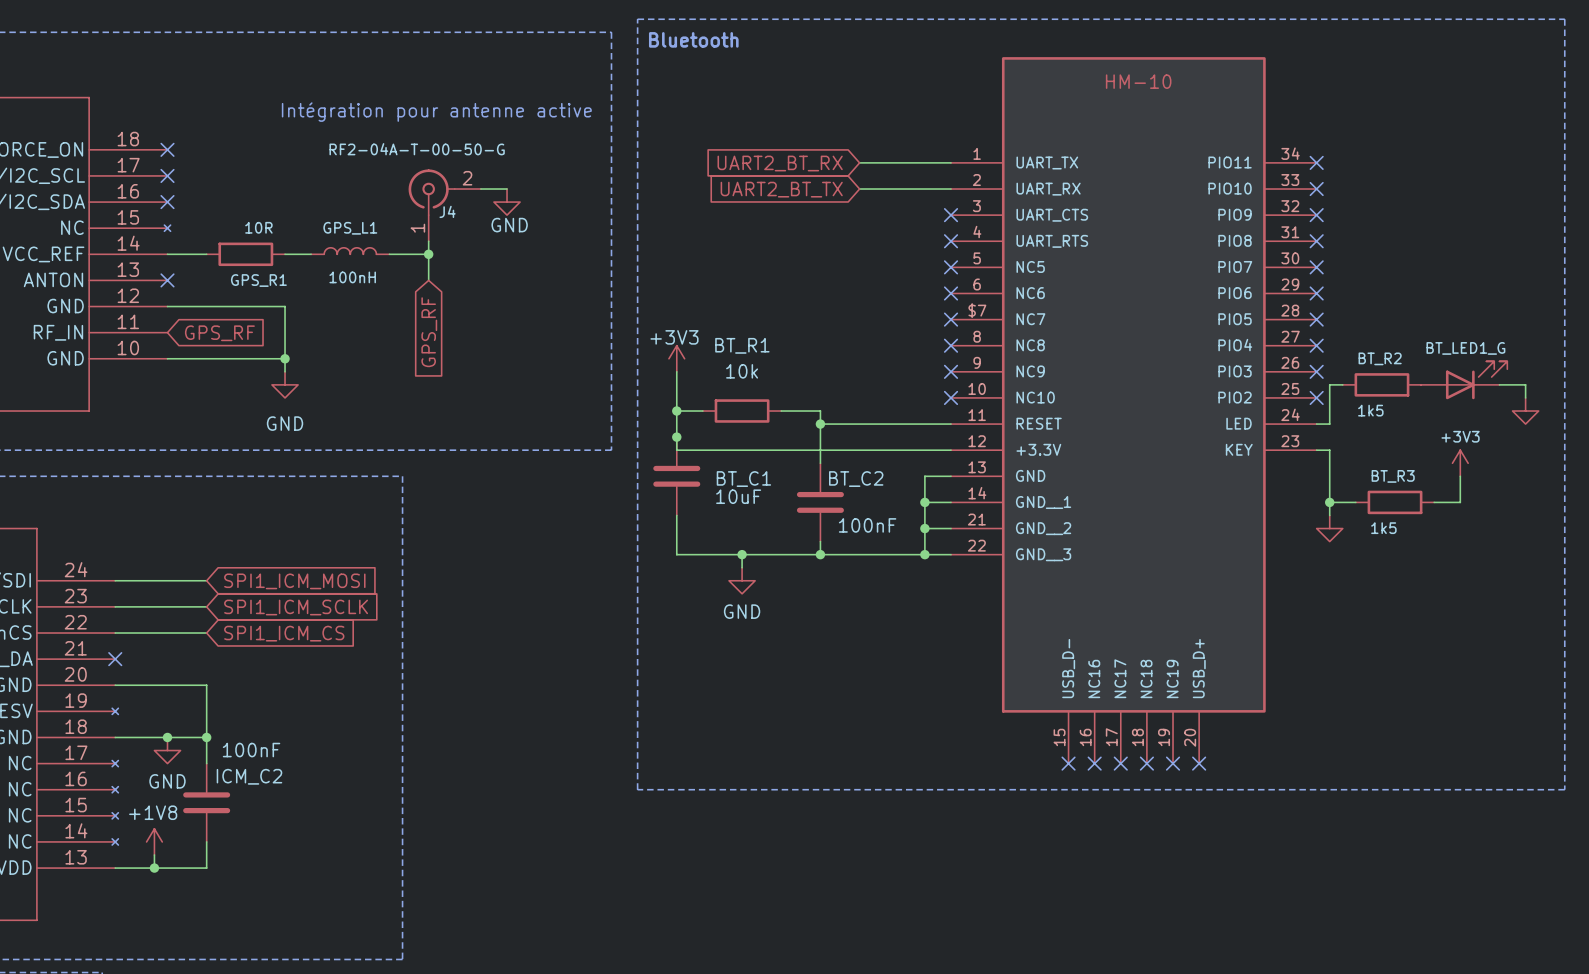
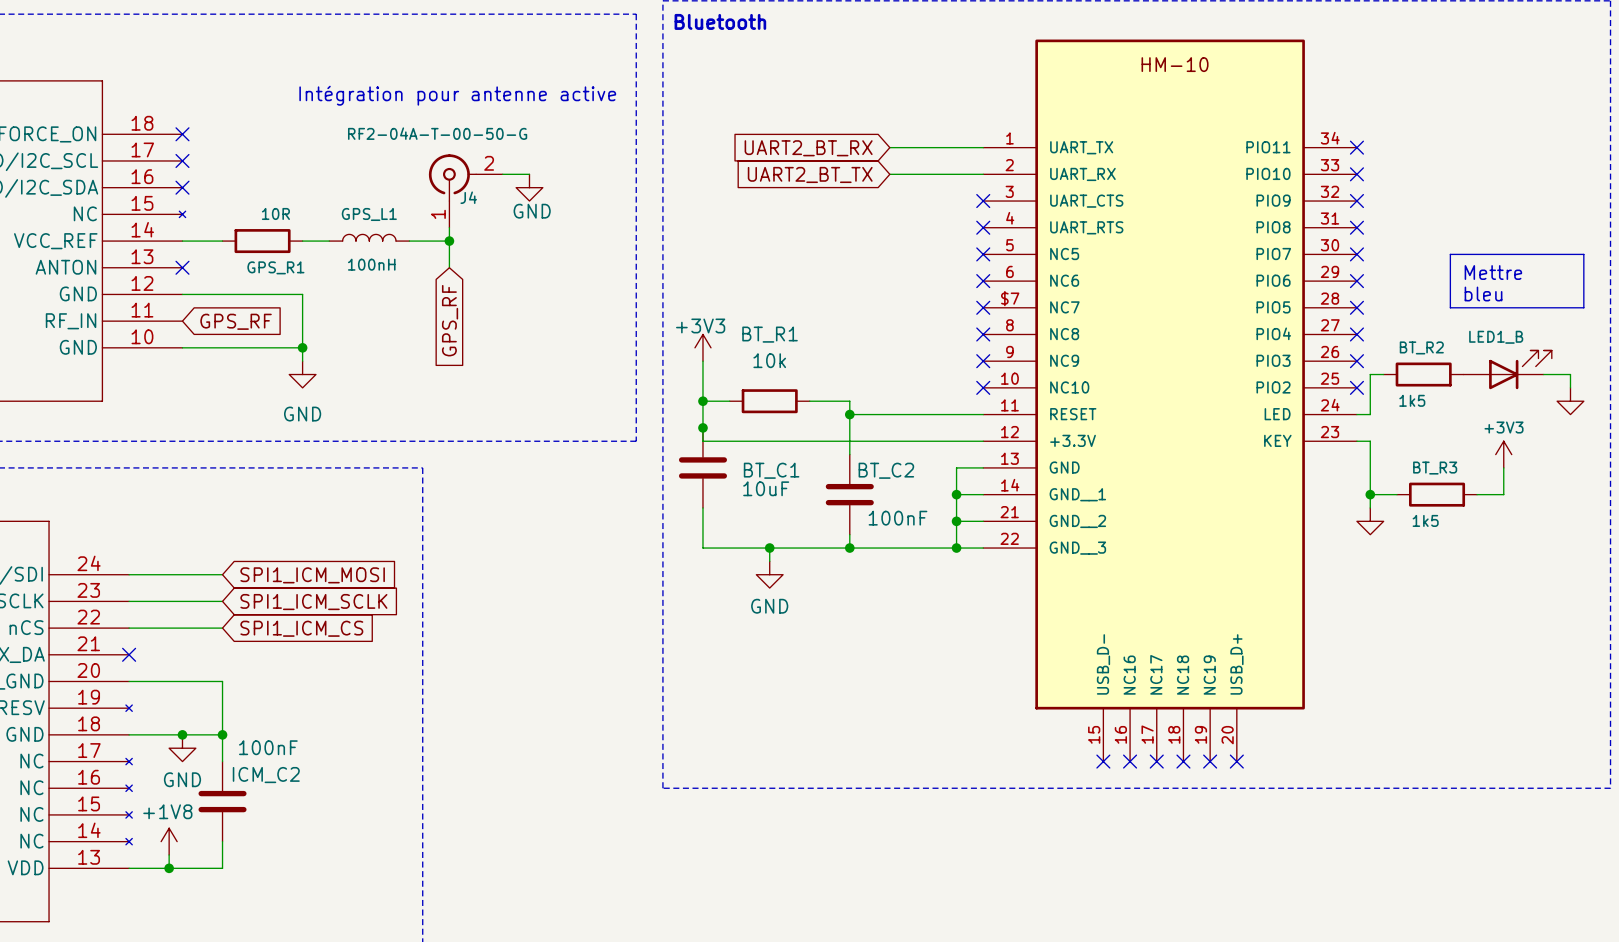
line: none -> (1450, 254) (1583, 254) (1583, 307) (1450, 307) (1450, 254)
text: none -> Mettre (1493, 272)
text: none -> bleu (1483, 294)
part value: BT_LED1_G (1465, 348) -> LED1_B (1496, 337)

